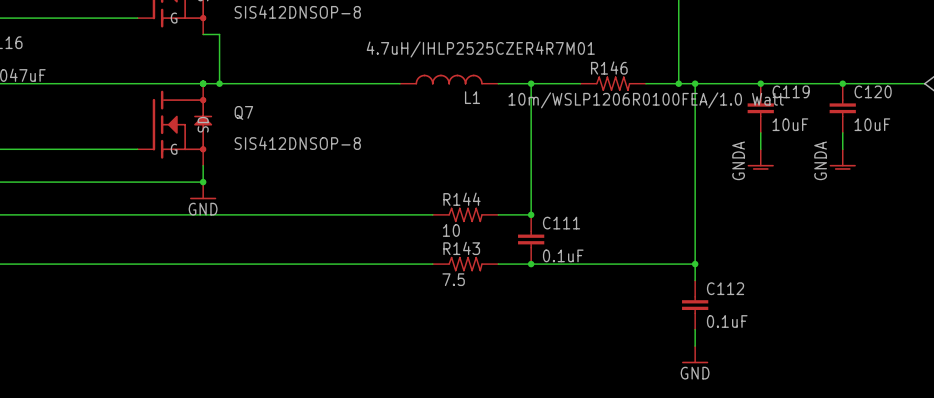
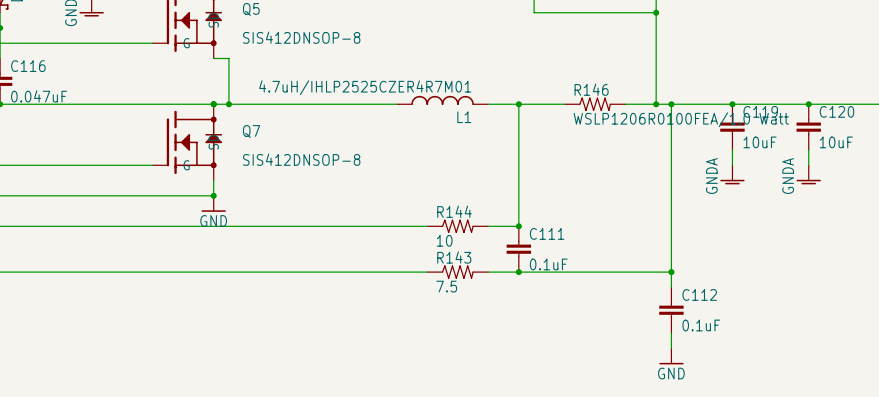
L1 value position: 4.7uH/IHLP2525CZER4R7M01 (480, 49) -> 4.7uH/IHLP2525CZER4R7M01 (365, 87)
R146 value: 10m/WSLP1206R0100FEA/1.0 Watt (646, 100) -> WSLP1206R0100FEA/1.0 Watt (681, 119)

